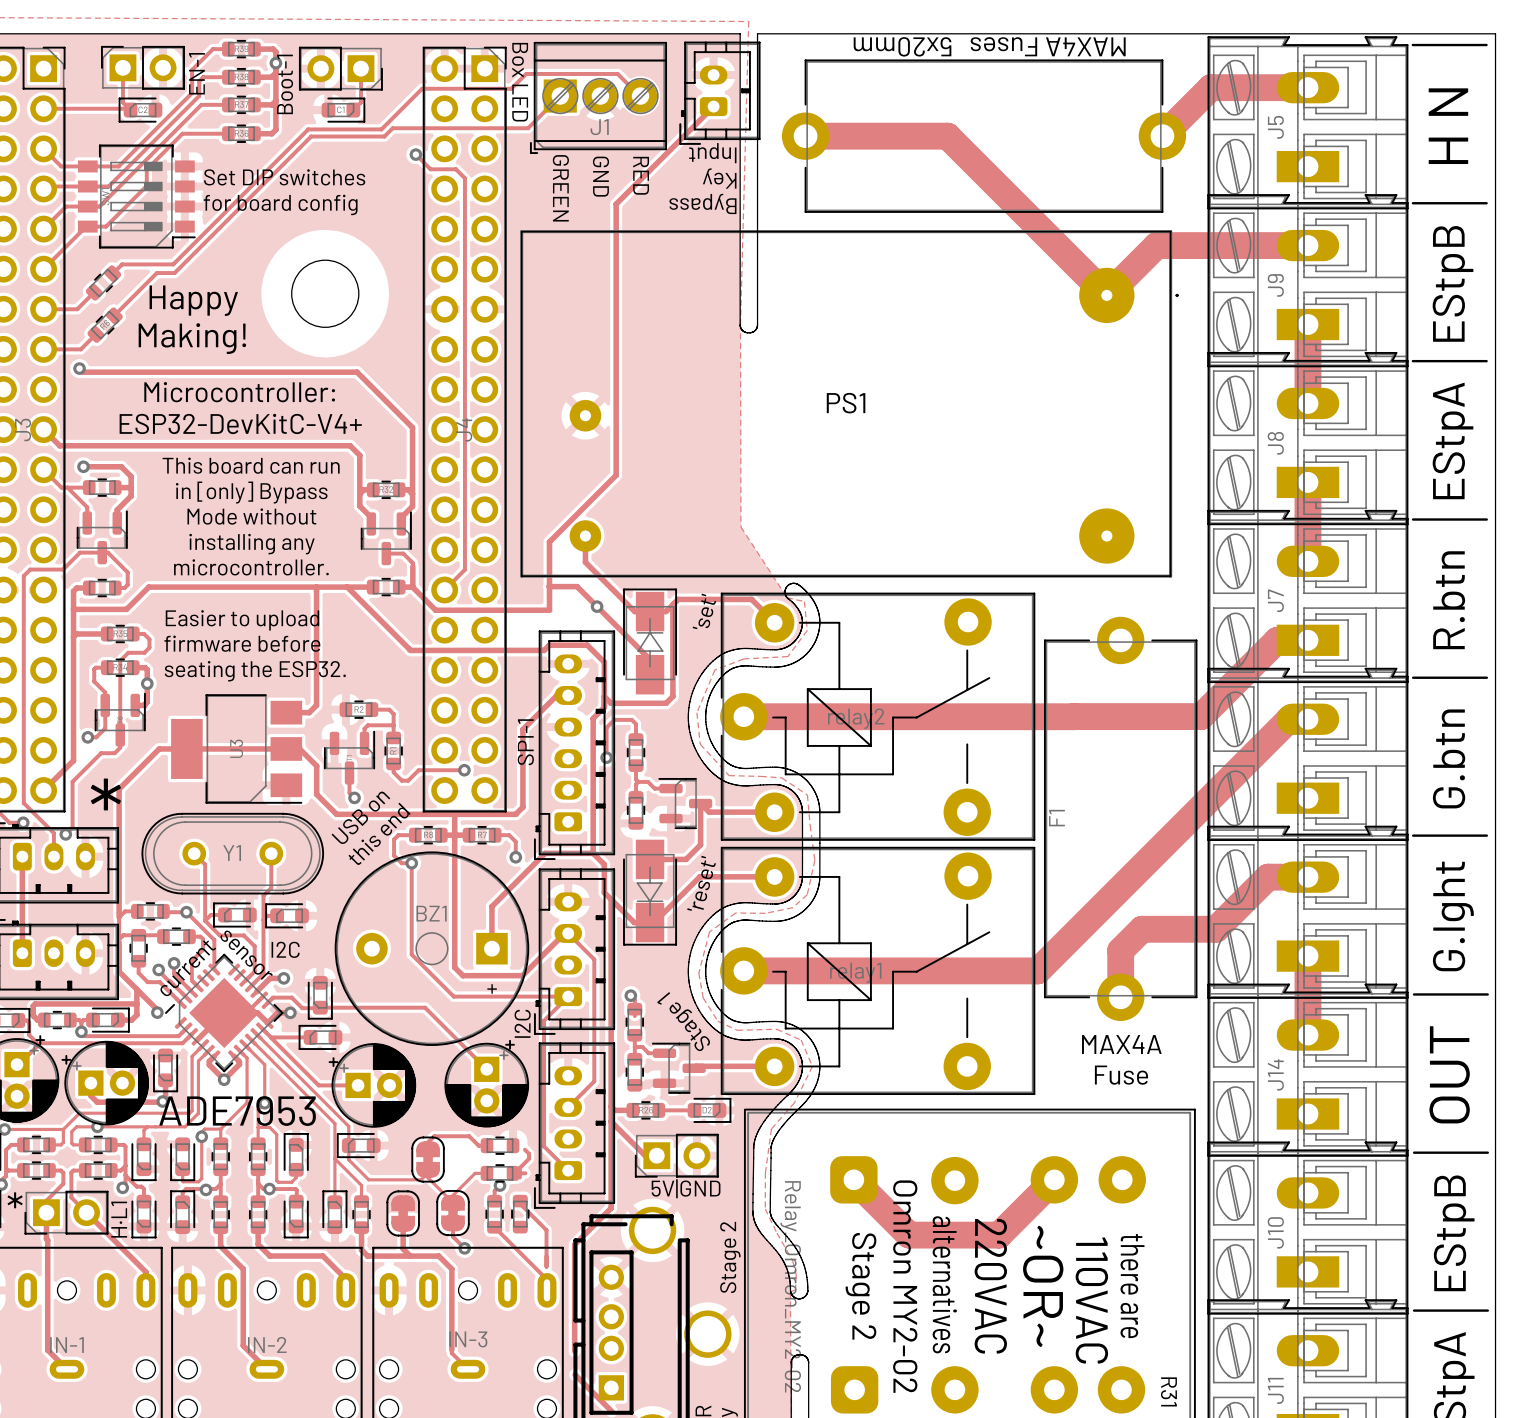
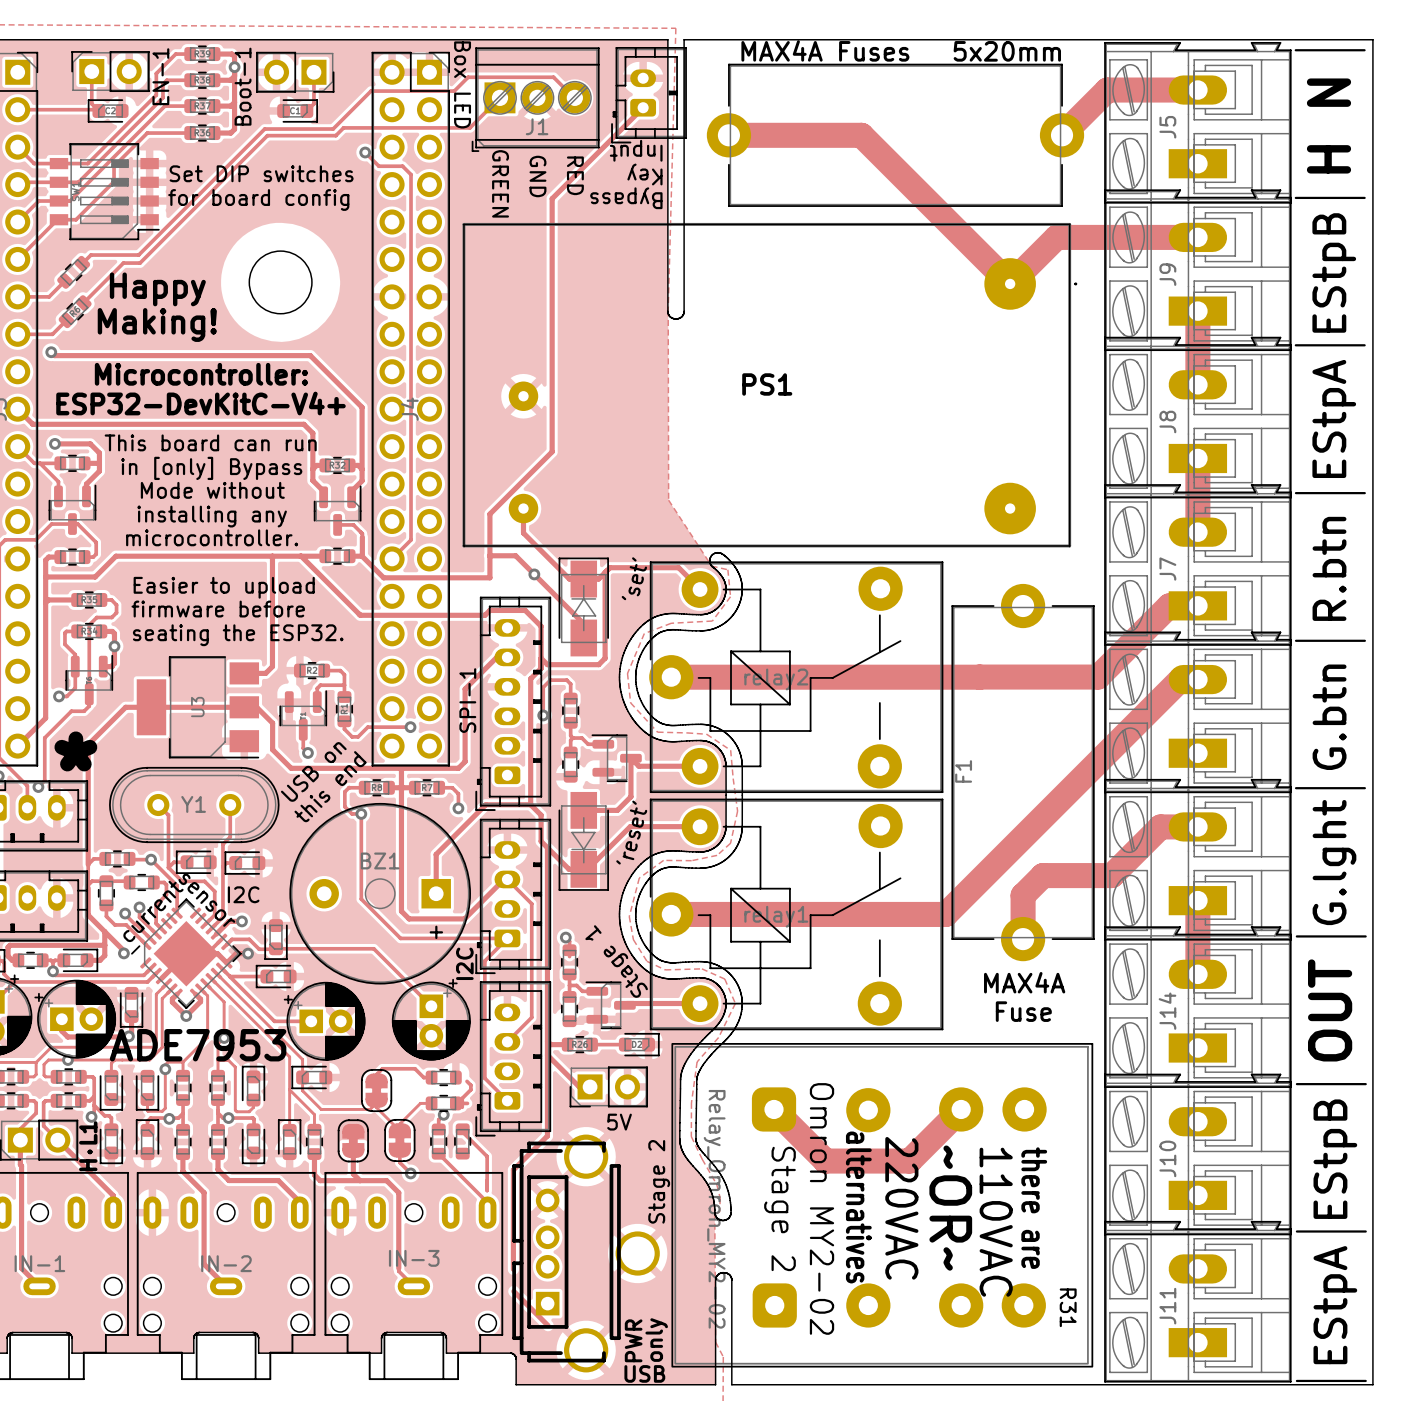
text rotation: 0° (989, 46) -> 180° (901, 50)
text: 5V|GND (686, 1188) -> 5V (619, 1122)

